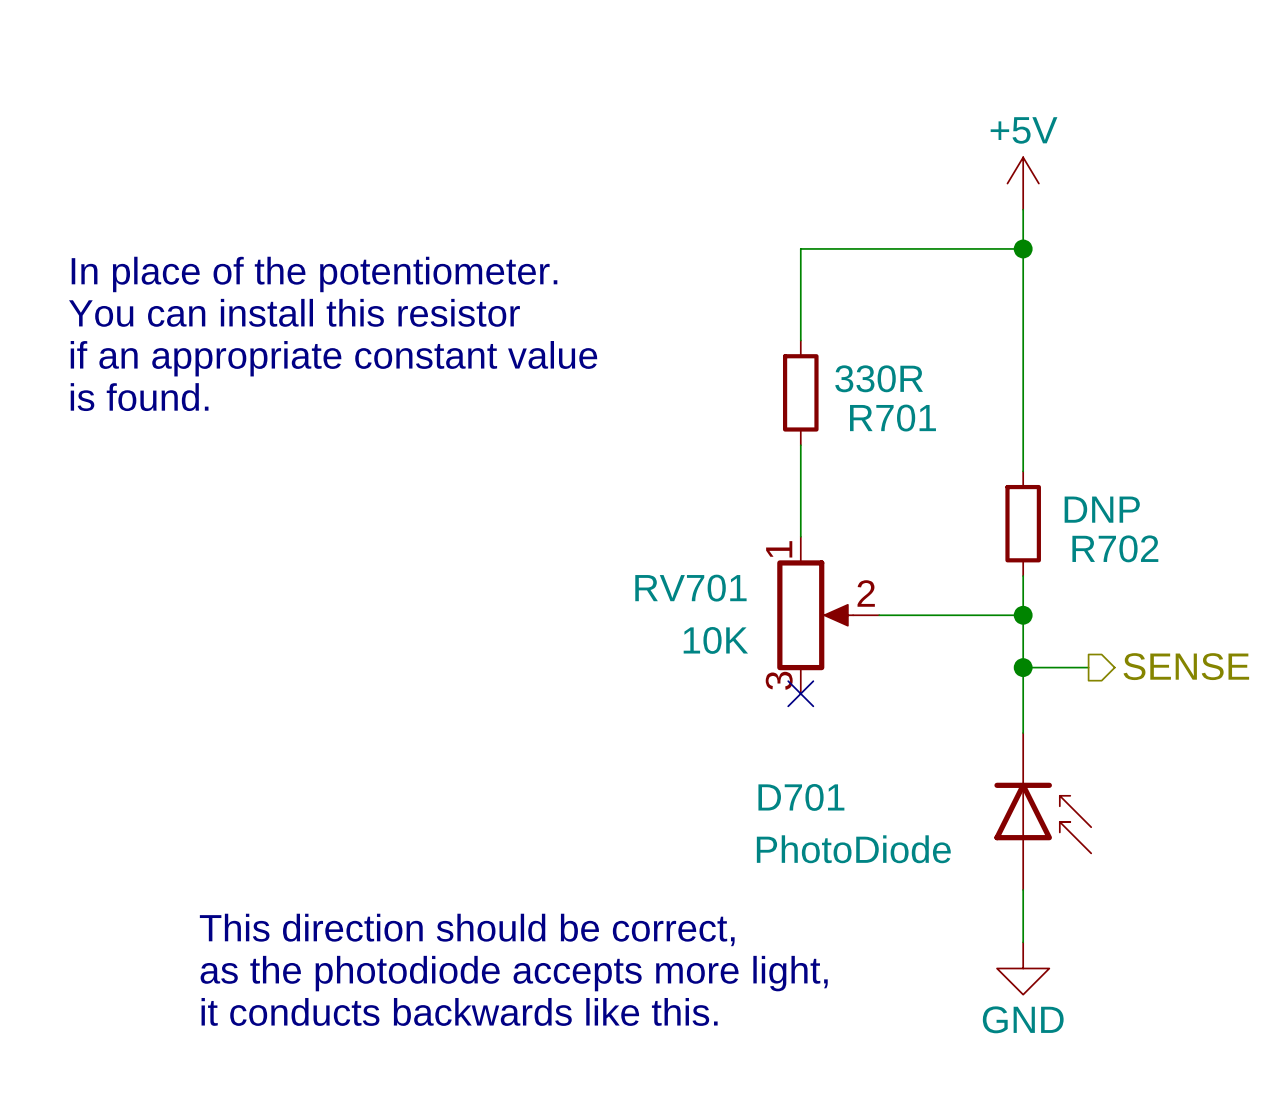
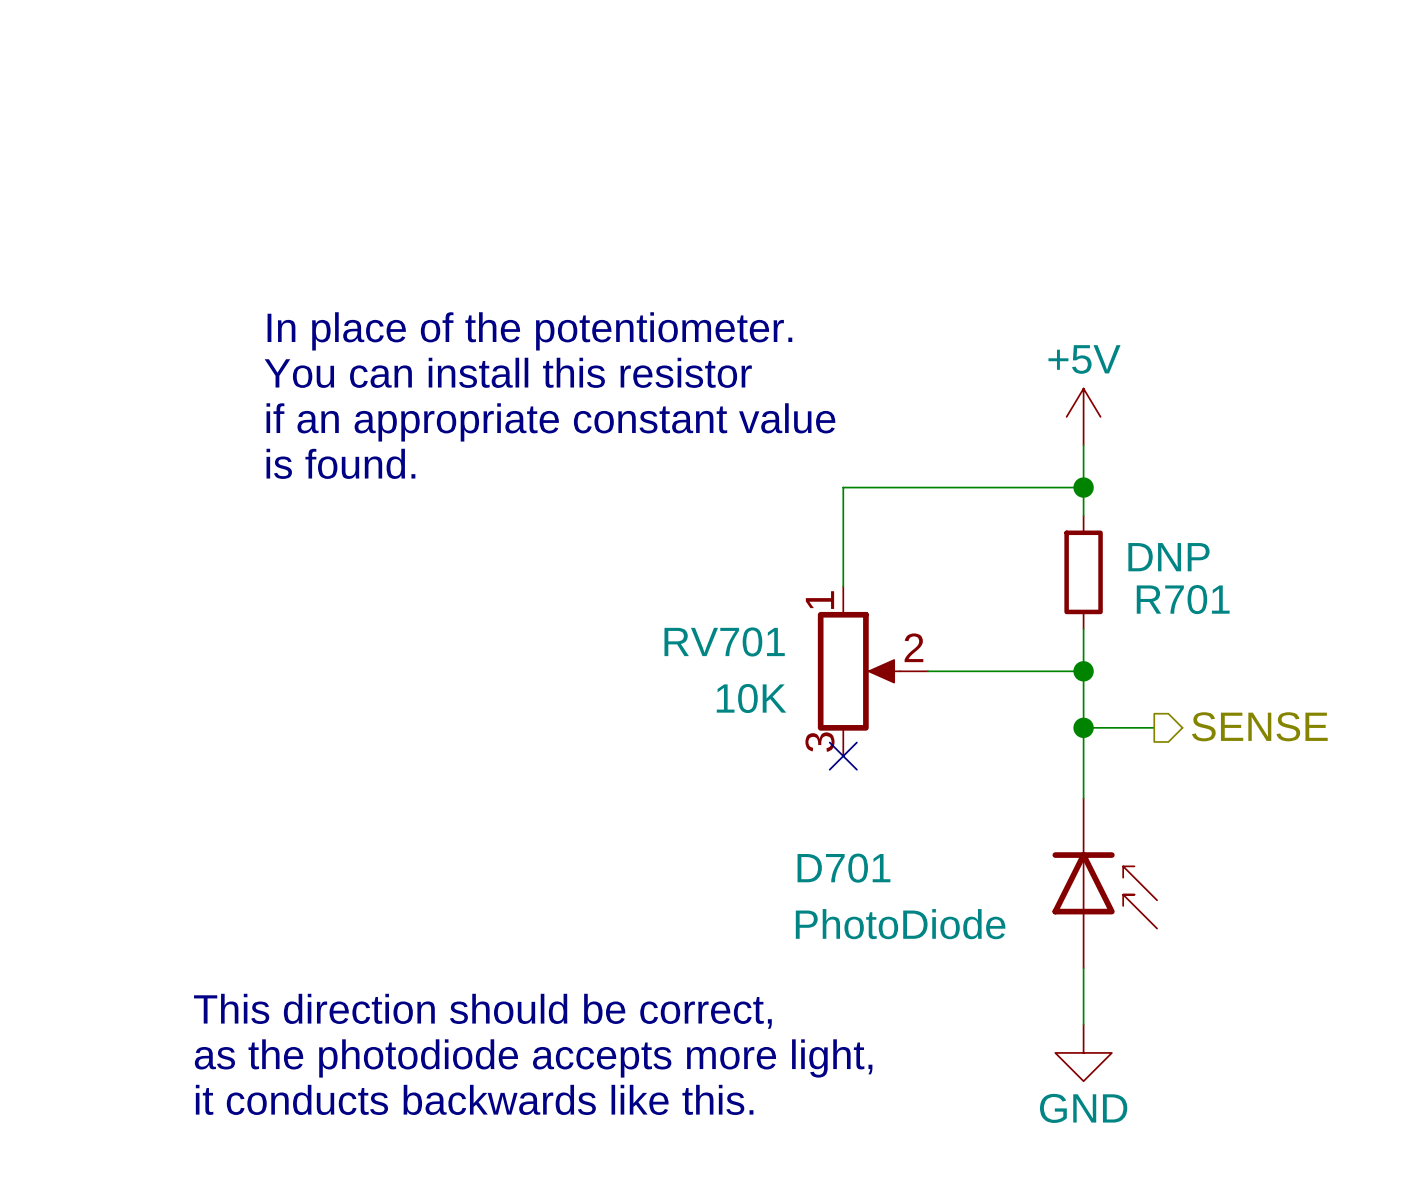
power symbol position: +5V (1023, 183) -> +5V (1083, 416)
wire: (1023, 209) (1023, 405) -> none
wire: (1023, 248) (800, 248) (800, 340) -> none
junction: (1023, 248) -> none
text position: In place of the potentiometer. (314, 274) -> In place of the potentiometer. (529, 331)
text position: You can install this resistor (294, 312) -> You can install this resistor (508, 372)
text position: if an appropriate constant value (333, 358) -> if an appropriate constant value (550, 422)
R701: 330R (800, 392) -> none
text position: is found. (139, 397) -> is found. (340, 463)
wire: none -> (843, 487) (1083, 487)
junction: none -> (1083, 487)
R702 name: R702 (1115, 548) -> R701 (1183, 599)

